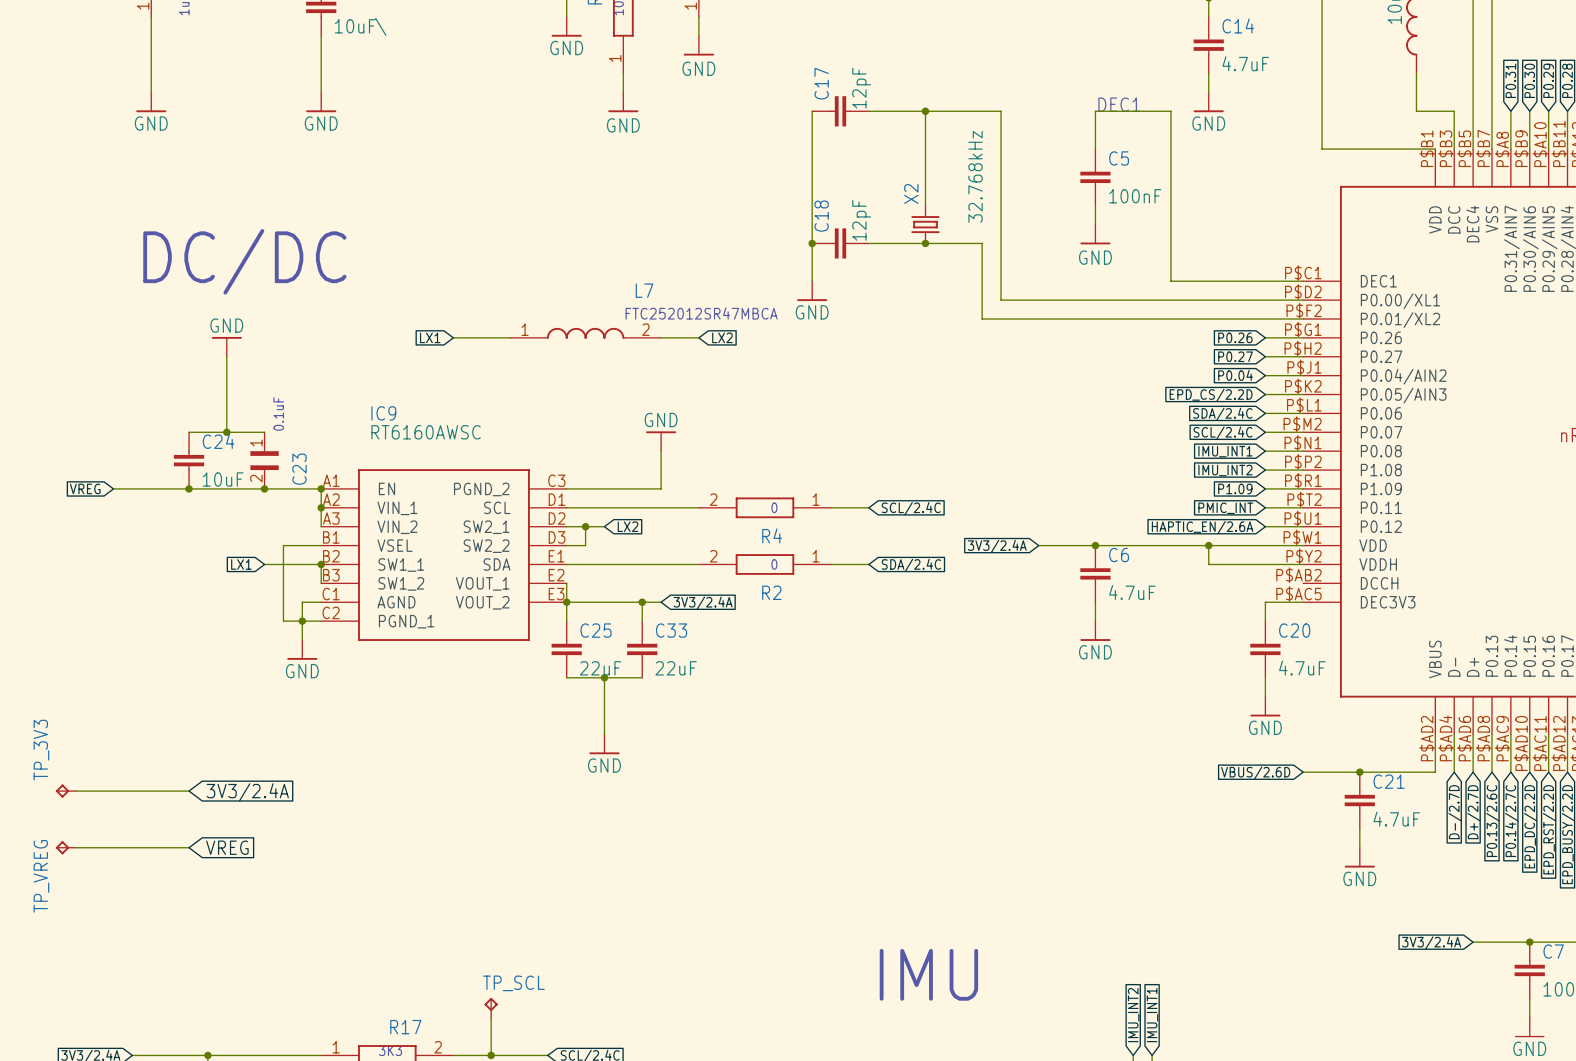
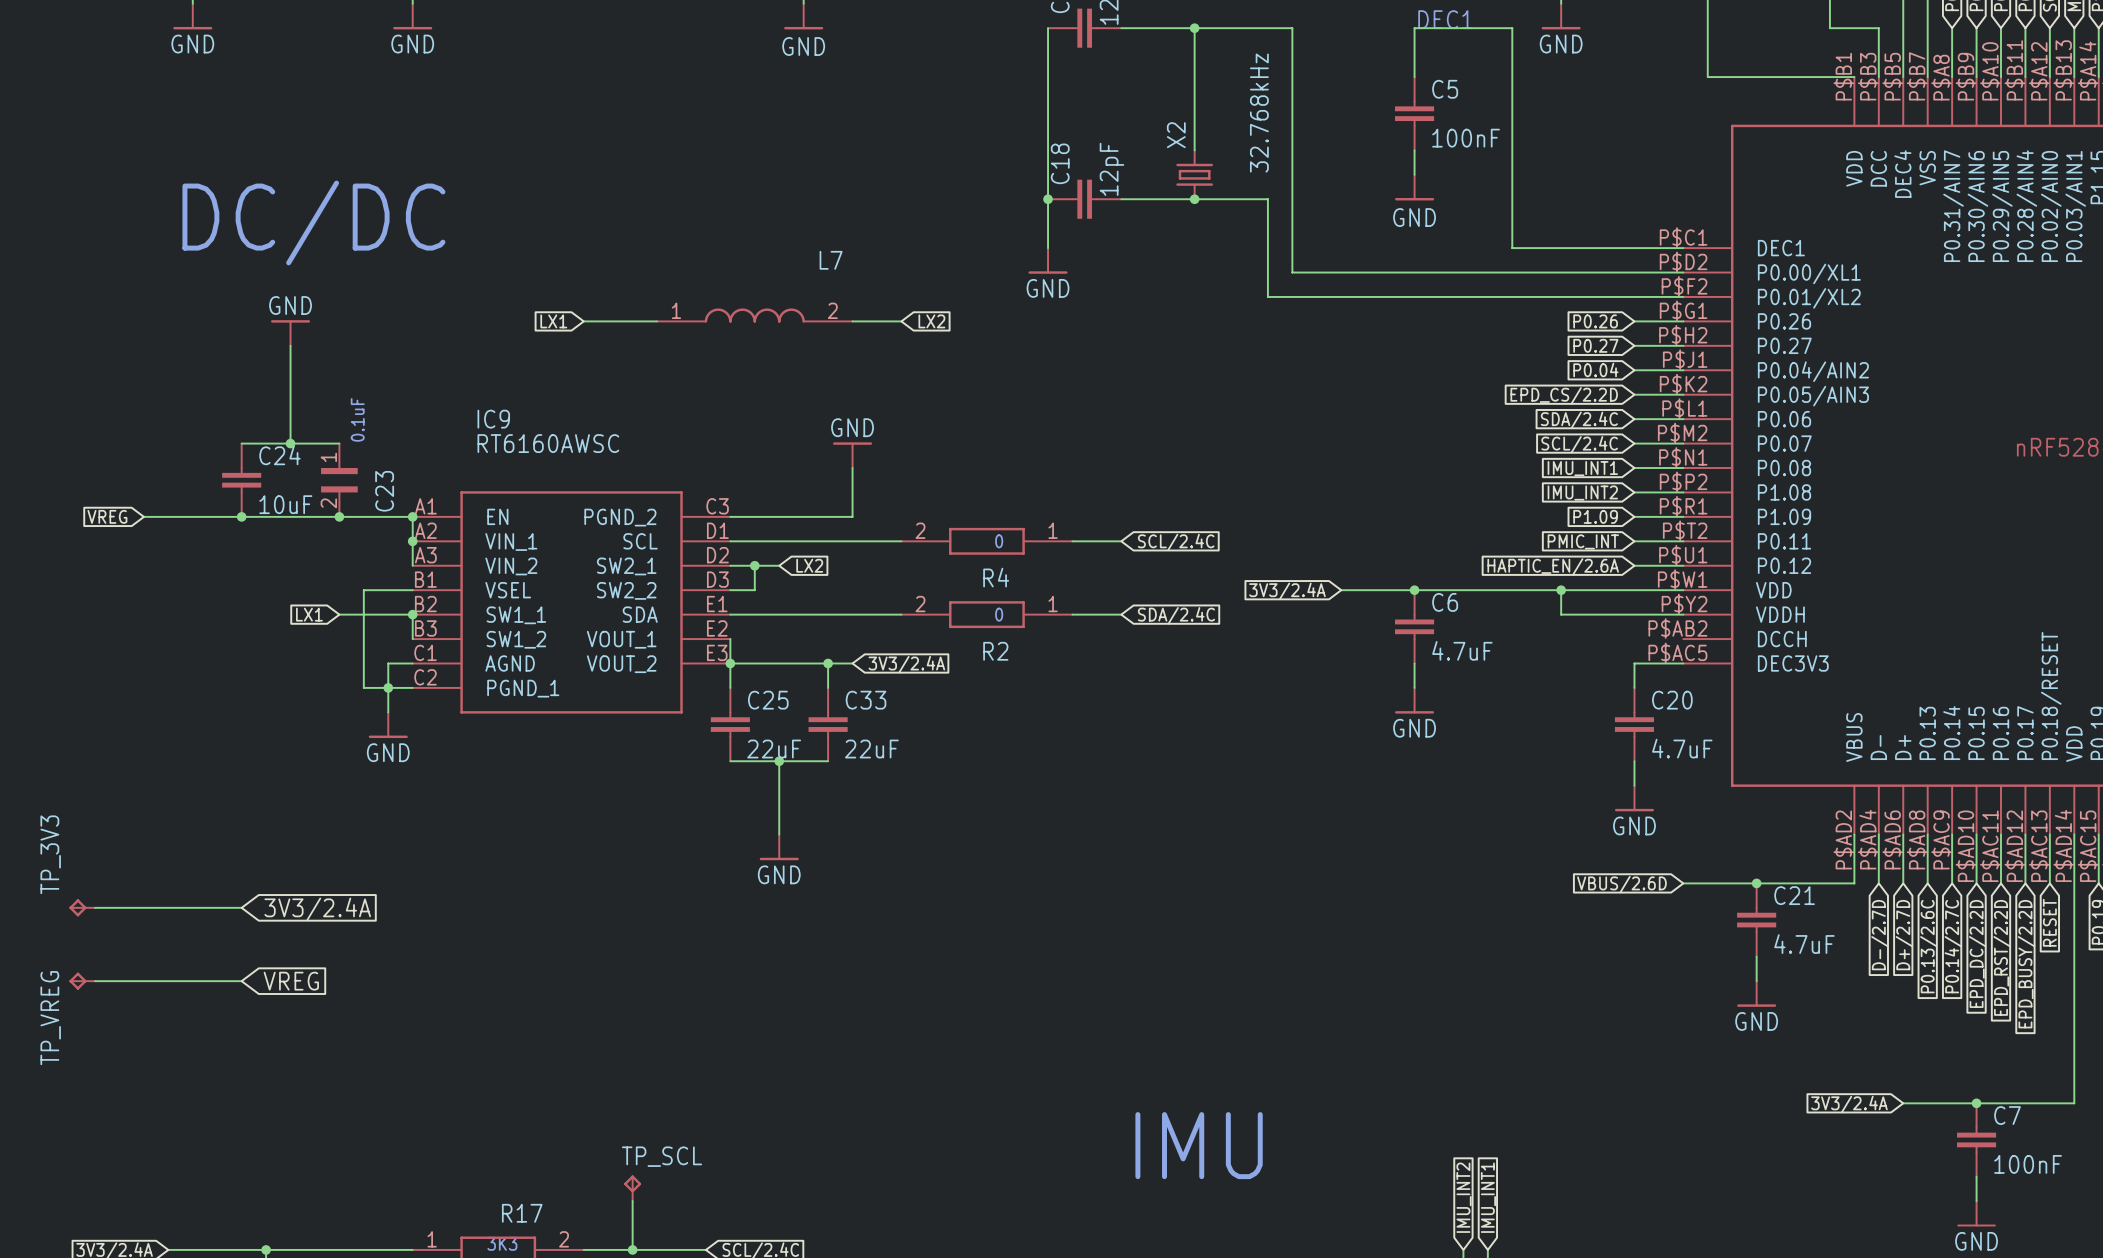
text: FTC252012SR47MBCA (701, 313) -> none

